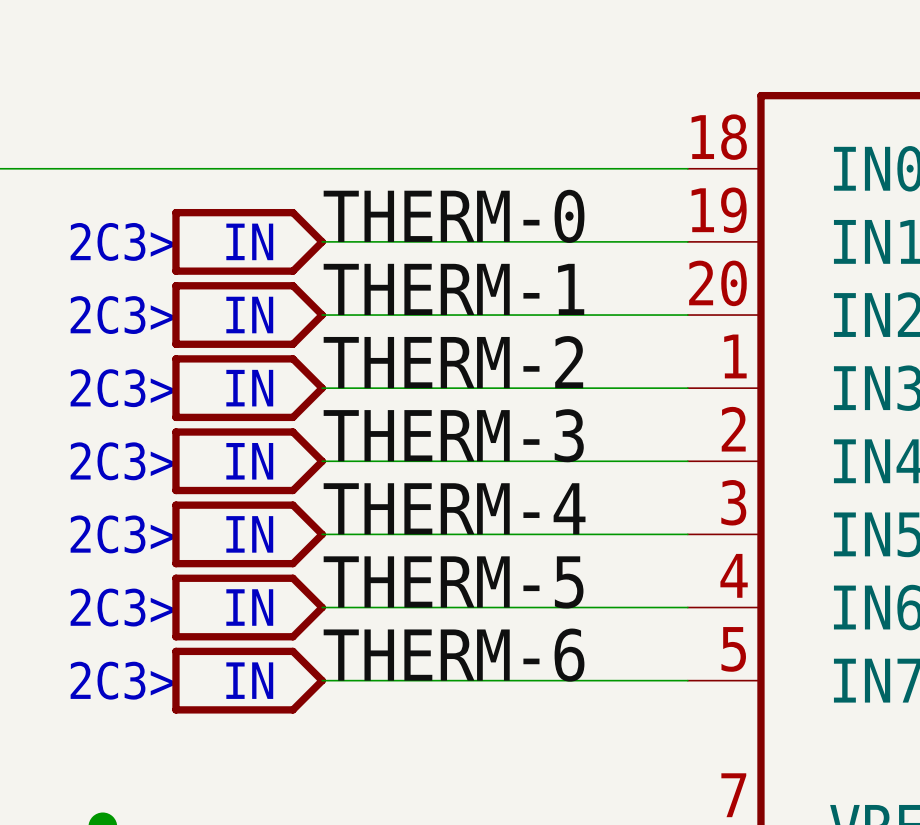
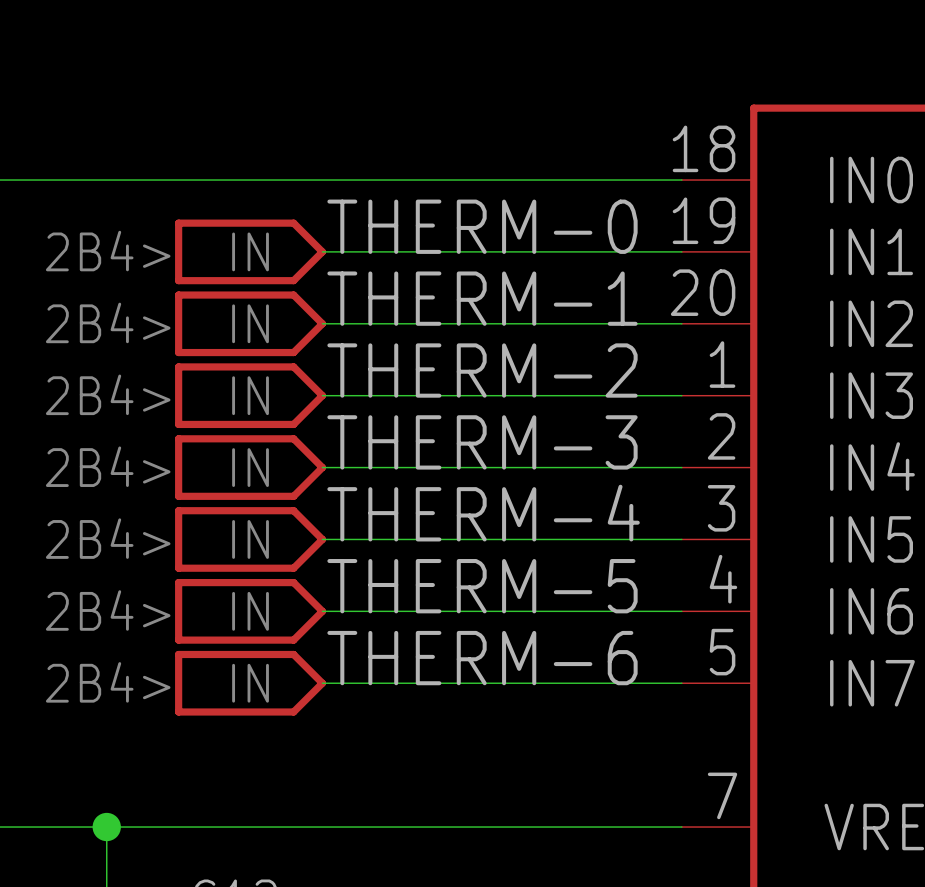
text: 2C3> (122, 241) -> 2B4> (108, 251)
text: 2C3> (122, 315) -> 2B4> (108, 322)
text: 2C3> (122, 388) -> 2B4> (108, 394)
text: 2C3> (122, 461) -> 2B4> (108, 466)
text: 2C3> (122, 534) -> 2B4> (108, 538)
text: 2C3> (122, 607) -> 2B4> (108, 610)
text: 2C3> (122, 680) -> 2B4> (108, 682)

